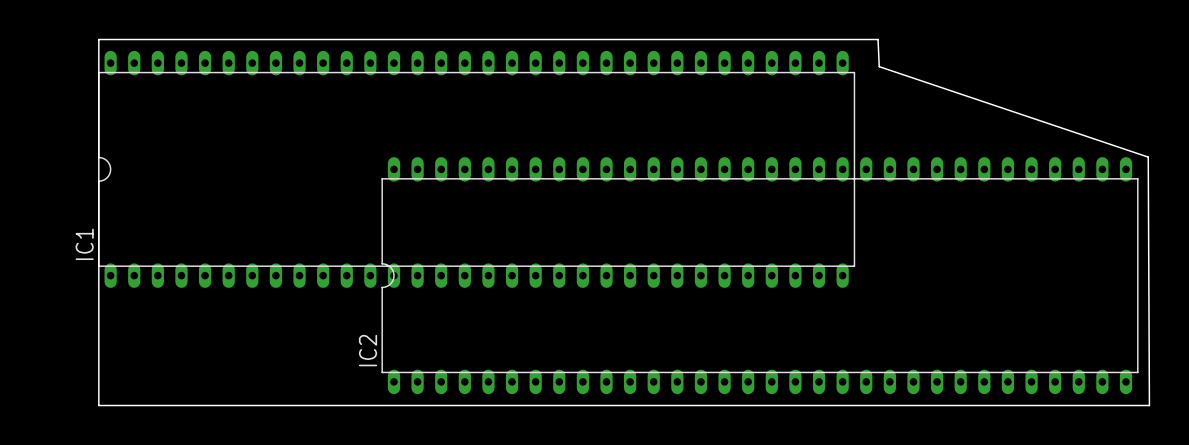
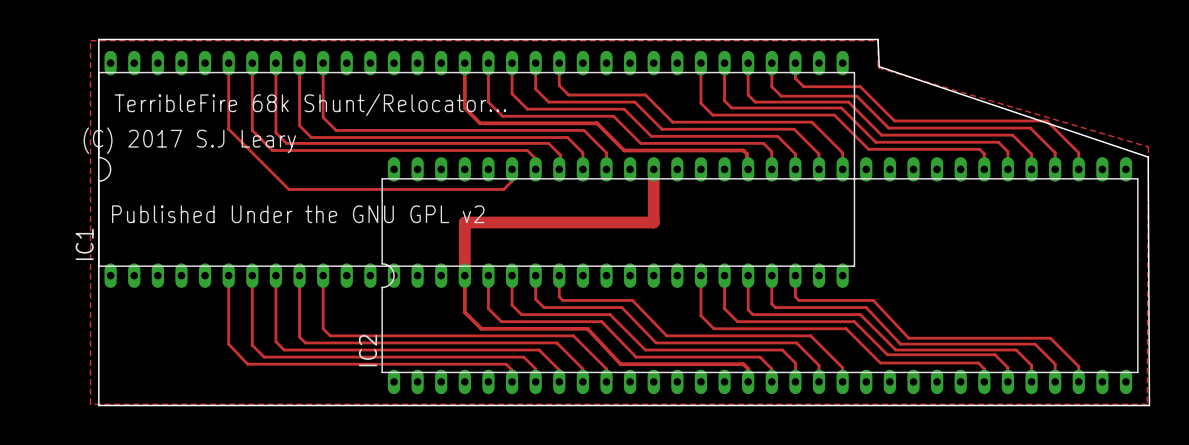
zone outline: none -> (90, 40) (878, 40) (878, 67) (1148, 146) (1147, 404) (90, 404) (90, 40)
track: none -> (228, 63) (228, 129) (288, 189) (503, 189) (512, 181) (512, 169)
track: none -> (252, 63) (252, 130) (272, 150) (527, 150) (536, 159) (535, 169)
track: none -> (275, 63) (275, 132) (286, 143) (548, 143) (560, 155) (559, 169)
track: none -> (299, 63) (299, 125) (311, 137) (567, 137) (582, 152) (582, 169)
track: none -> (323, 63) (323, 117) (336, 130) (584, 130) (606, 152) (606, 169)
track: none -> (464, 63) (464, 107) (480, 123) (597, 123) (624, 150) (743, 150) (747, 154) (748, 169)
track: none -> (488, 63) (488, 102) (502, 116) (613, 116) (640, 143) (763, 143) (771, 151) (771, 169)
track: none -> (512, 63) (512, 93) (527, 109) (624, 109) (651, 136) (777, 136) (795, 154) (795, 169)
track: none -> (535, 63) (535, 89) (548, 102) (634, 102) (662, 129) (794, 129) (819, 154) (819, 169)
track: none -> (559, 63) (559, 85) (568, 95) (645, 95) (672, 122) (811, 122) (842, 152) (842, 169)
track: none -> (700, 63) (700, 103) (712, 115) (834, 115) (868, 149) (979, 149) (984, 154) (984, 169)
track: none -> (724, 63) (724, 100) (731, 107) (841, 107) (875, 142) (998, 142) (1007, 151) (1007, 169)
track: none -> (748, 63) (748, 95) (755, 102) (848, 102) (881, 135) (1012, 135) (1031, 154) (1031, 169)
track: none -> (771, 63) (771, 86) (781, 96) (856, 96) (888, 128) (1030, 128) (1055, 152) (1055, 169)
track: none -> (795, 63) (795, 78) (803, 86) (860, 86) (894, 120) (1046, 120) (1078, 152) (1078, 169)
text: none -> TerribleFire 68k Shunt/Relocator... (310, 104)
text: none -> (C) 2017 S.J Leary (189, 140)
track: none -> (653, 169) (653, 222) (464, 222) (464, 312) (481, 328) (587, 328) (620, 364) (743, 364) (748, 368) (748, 381)
text: none -> Published Under the GNU GPL v2 (298, 214)
track: none -> (228, 275) (228, 344) (247, 364) (506, 364) (512, 370) (512, 381)
track: none -> (252, 275) (252, 345) (264, 357) (523, 357) (535, 368) (535, 381)
track: none -> (275, 275) (275, 341) (284, 350) (539, 350) (559, 370) (559, 381)
track: none -> (299, 275) (299, 337) (305, 342) (556, 342) (582, 368) (582, 381)
track: none -> (323, 275) (323, 328) (330, 335) (573, 335) (606, 368) (606, 381)
track: none -> (488, 275) (488, 308) (501, 321) (601, 321) (636, 357) (759, 357) (771, 368) (771, 381)
track: none -> (512, 275) (512, 305) (521, 314) (610, 314) (645, 350) (782, 350) (795, 363) (795, 381)
track: none -> (535, 275) (535, 299) (543, 307) (621, 307) (656, 342) (796, 342) (819, 365) (819, 381)
track: none -> (559, 275) (559, 296) (562, 300) (632, 300) (666, 335) (810, 335) (842, 367) (842, 381)
track: none -> (700, 275) (700, 315) (713, 328) (846, 328) (880, 363) (978, 363) (984, 368) (984, 381)
track: none -> (724, 275) (724, 308) (737, 321) (854, 321) (887, 354) (994, 354) (1007, 367) (1007, 381)
track: none -> (748, 275) (748, 309) (752, 314) (860, 314) (895, 350) (1016, 350) (1031, 365) (1031, 381)
track: none -> (771, 275) (771, 303) (775, 307) (866, 307) (900, 344) (1035, 344) (1055, 364) (1055, 381)
track: none -> (795, 275) (795, 296) (798, 300) (873, 300) (908, 338) (1050, 338) (1078, 366) (1078, 381)

